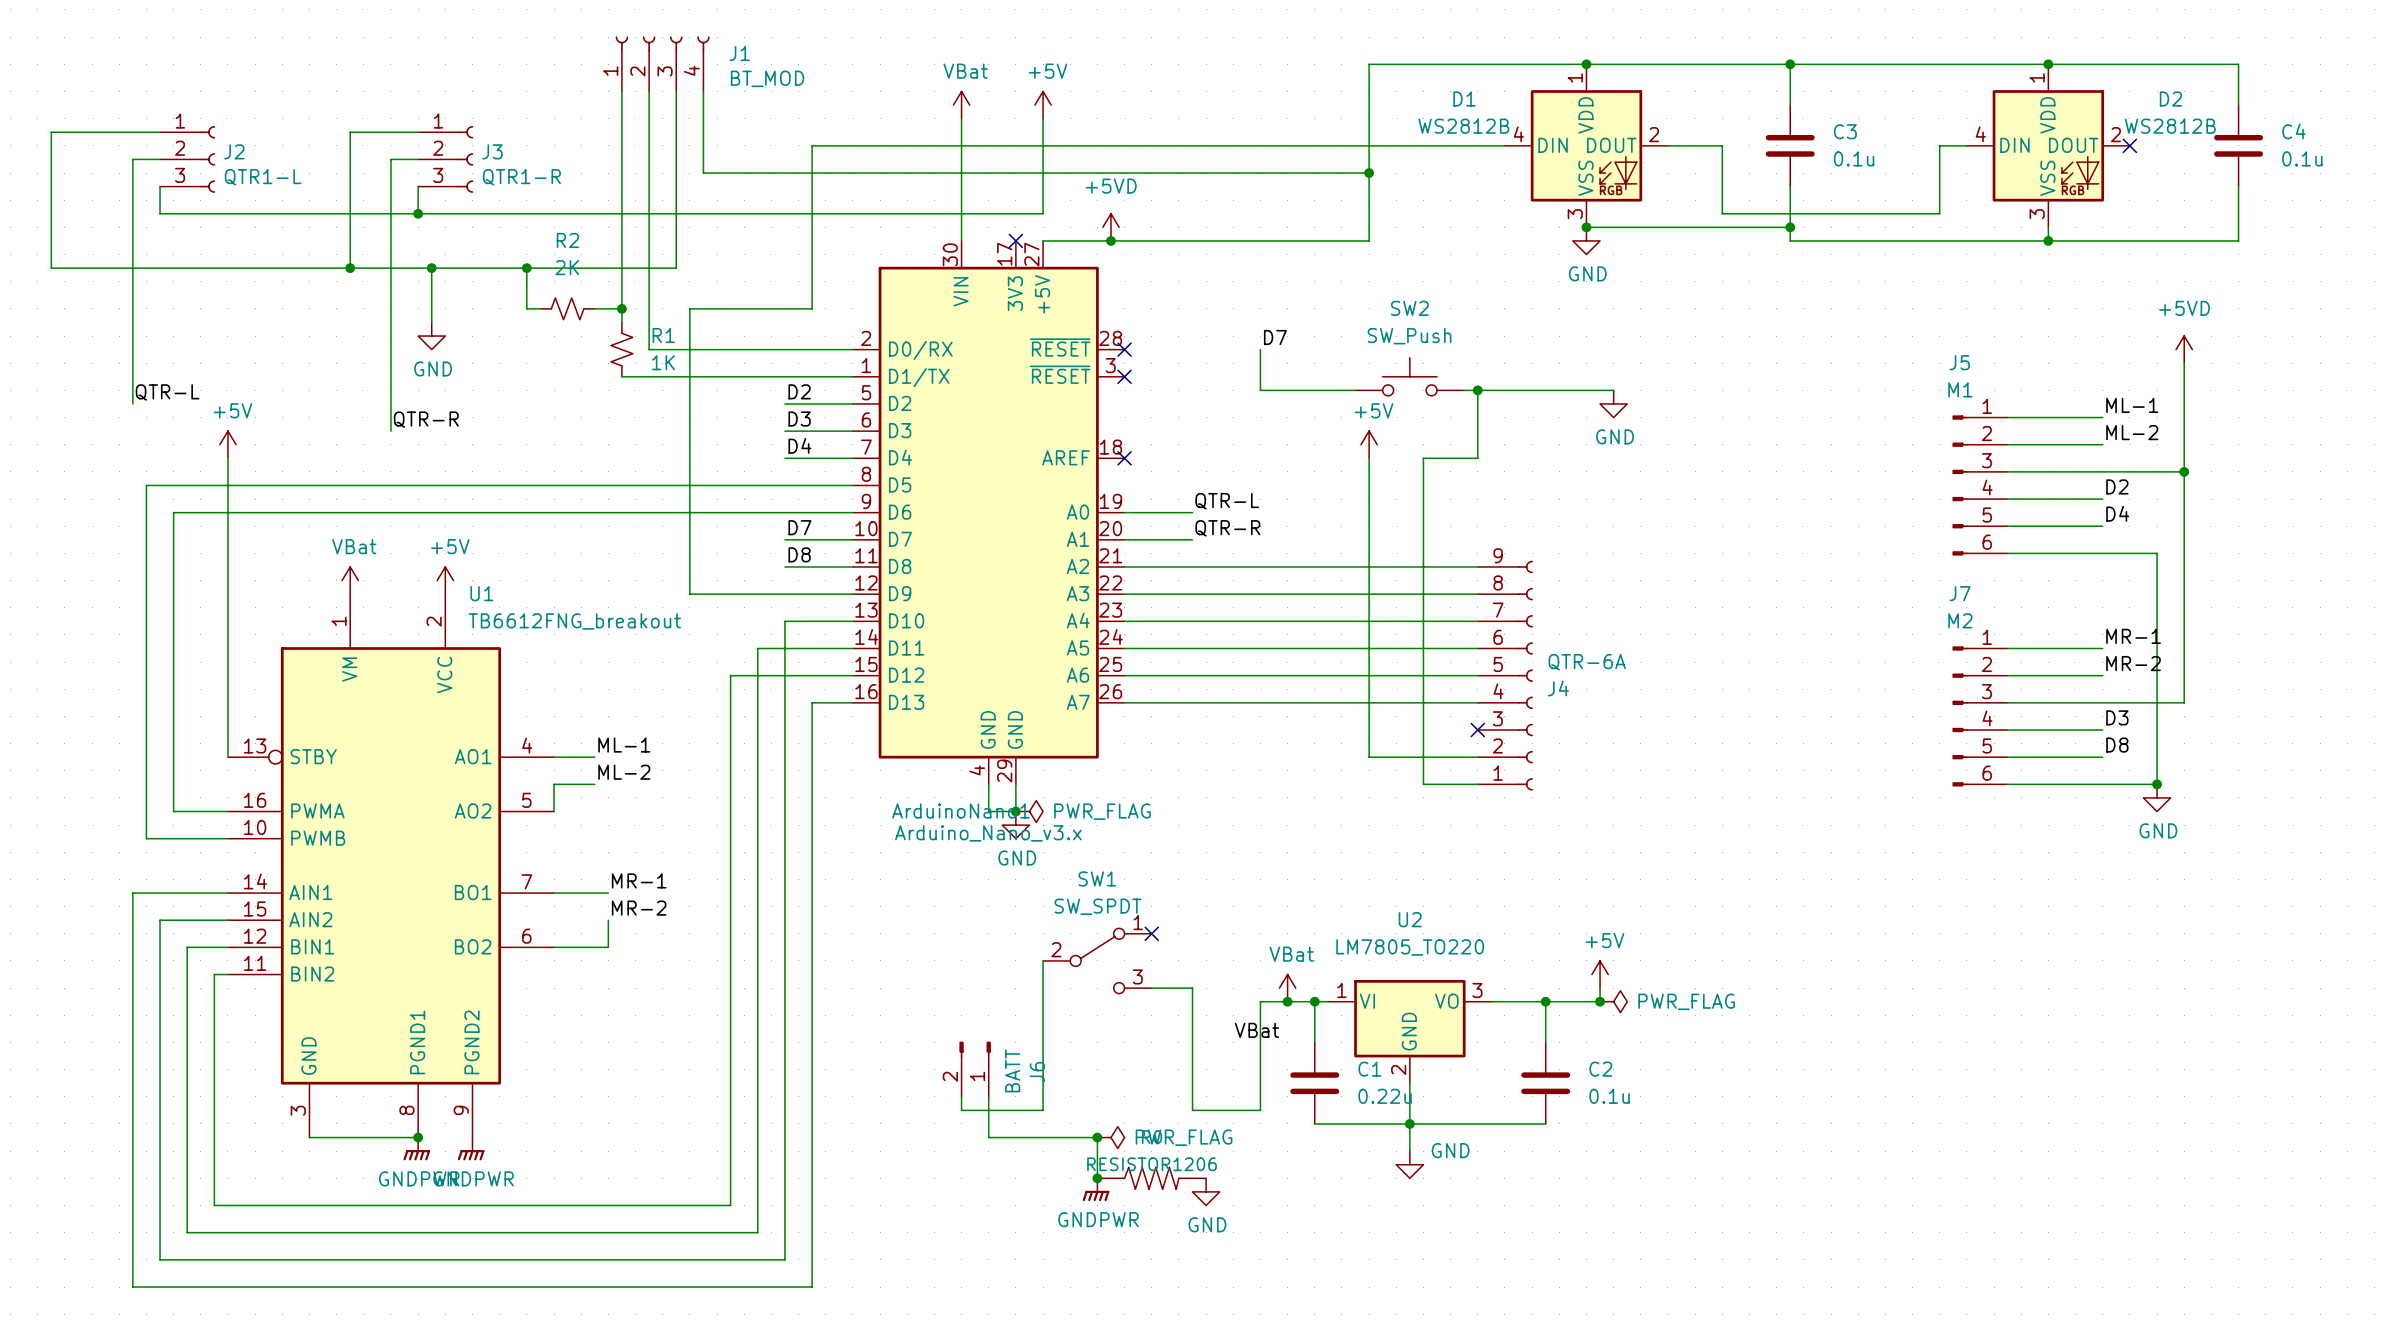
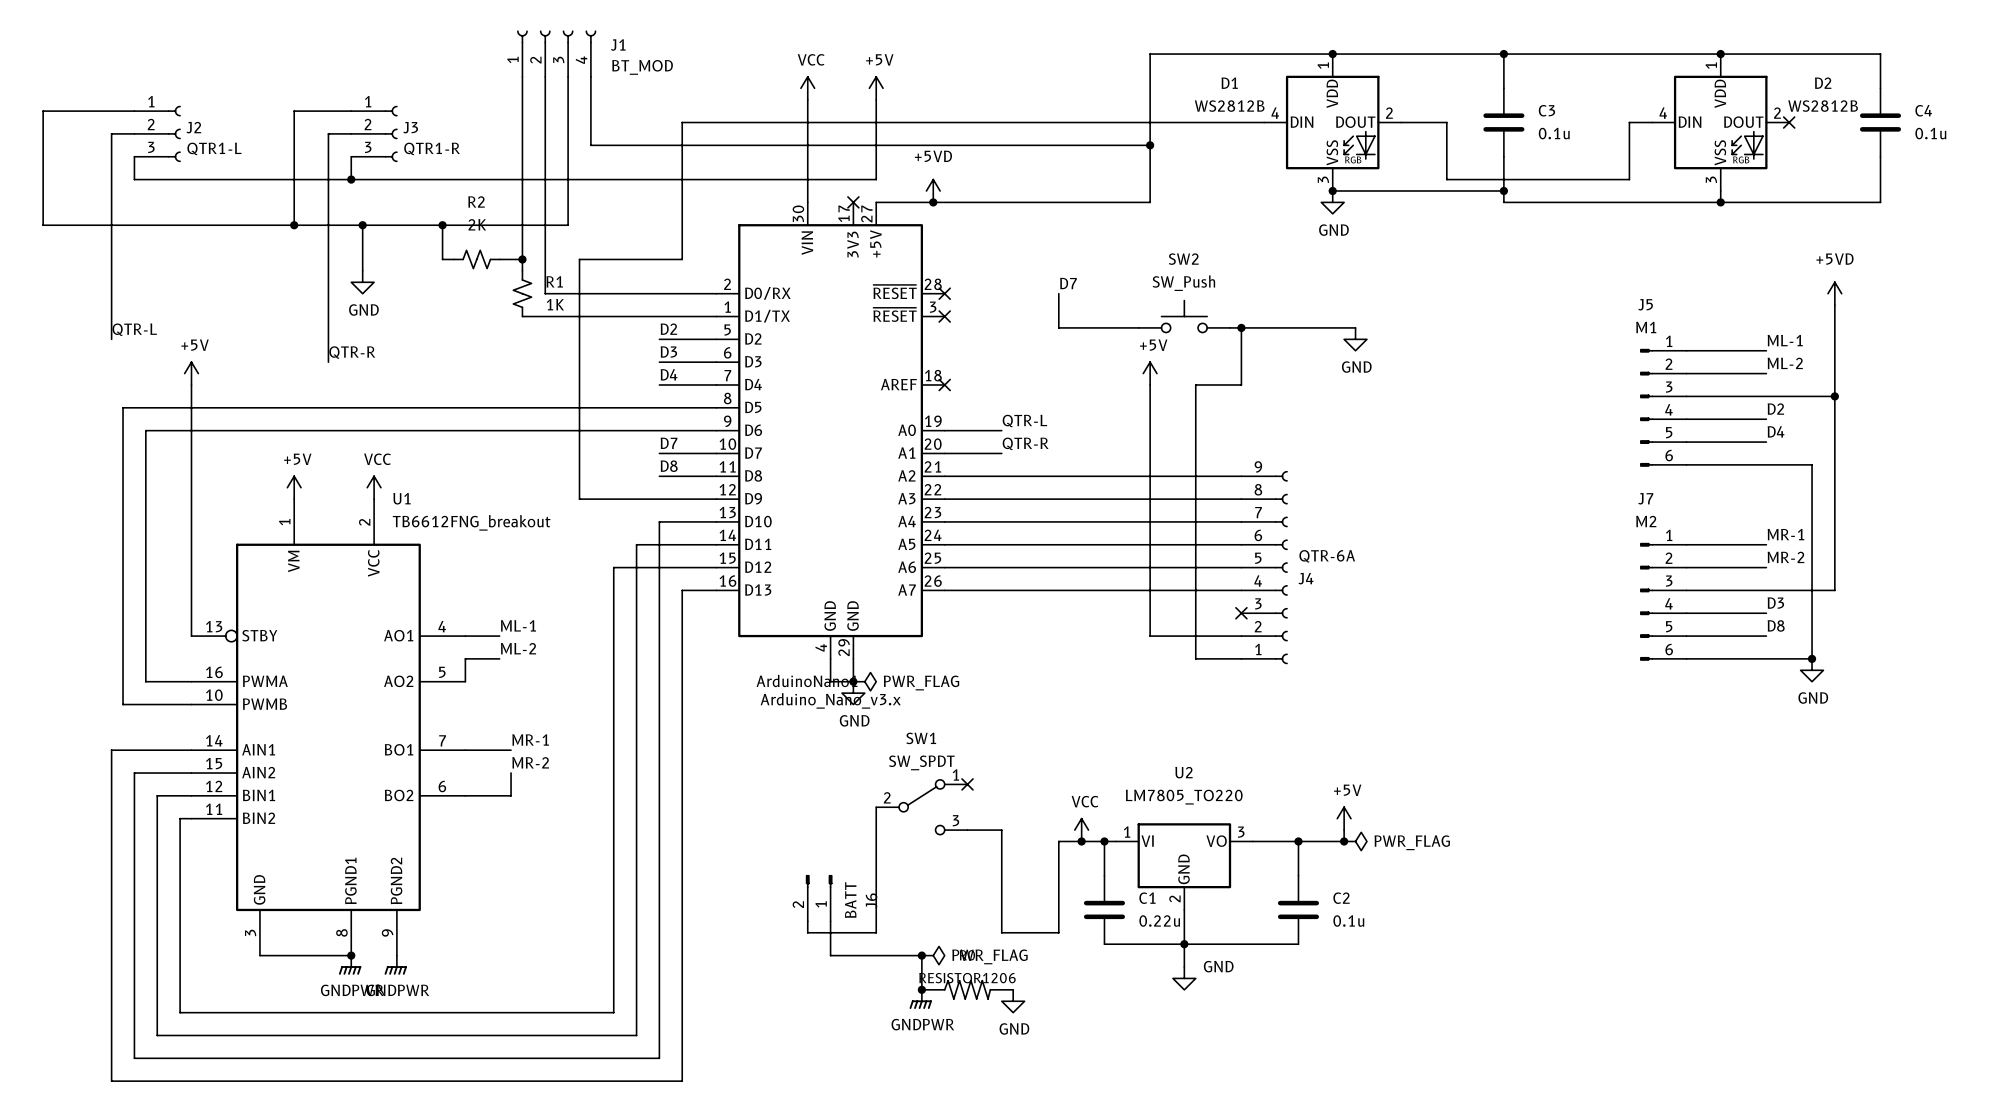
power symbol: VBat (961, 105) -> VCC (807, 88)
power symbol: VBat (350, 580) -> +5V (294, 487)
power symbol: +5V (445, 580) -> VCC (374, 487)
power symbol: VBat (1287, 988) -> VCC (1081, 830)
label: VBat (1256, 1030) -> none

